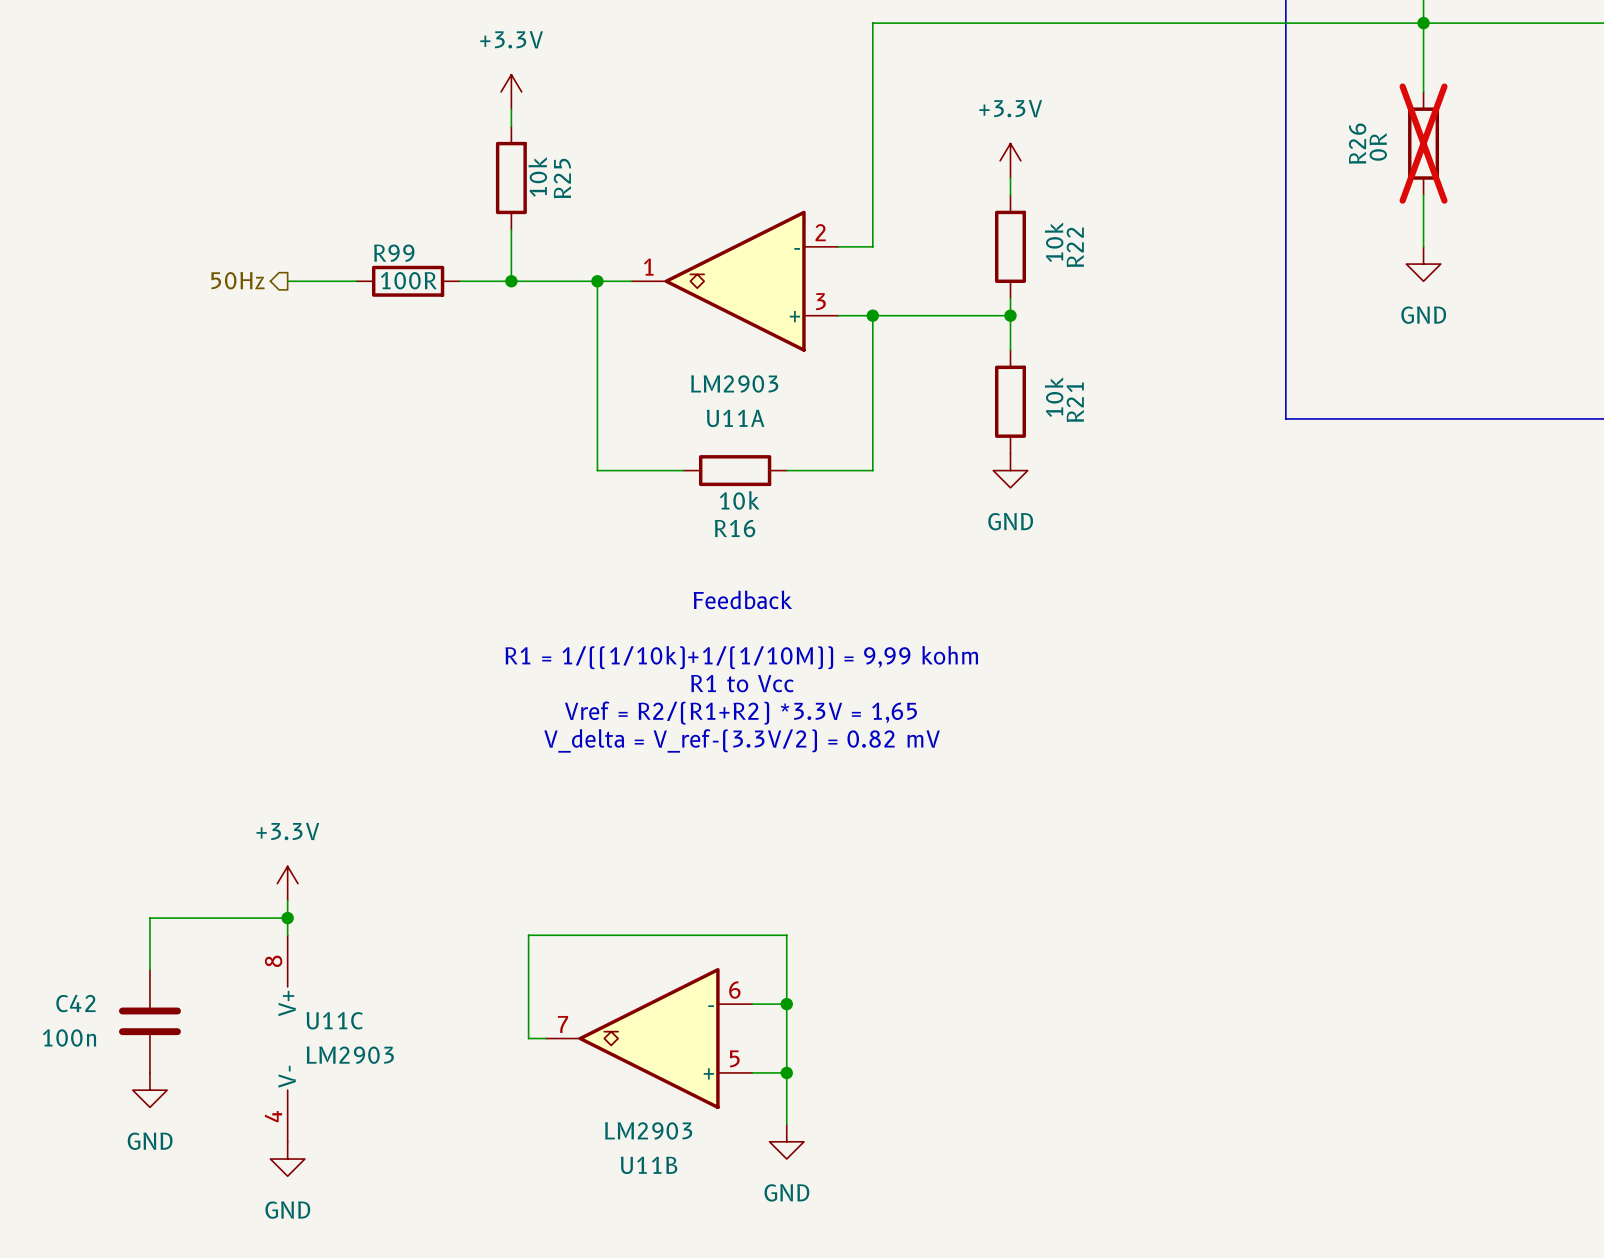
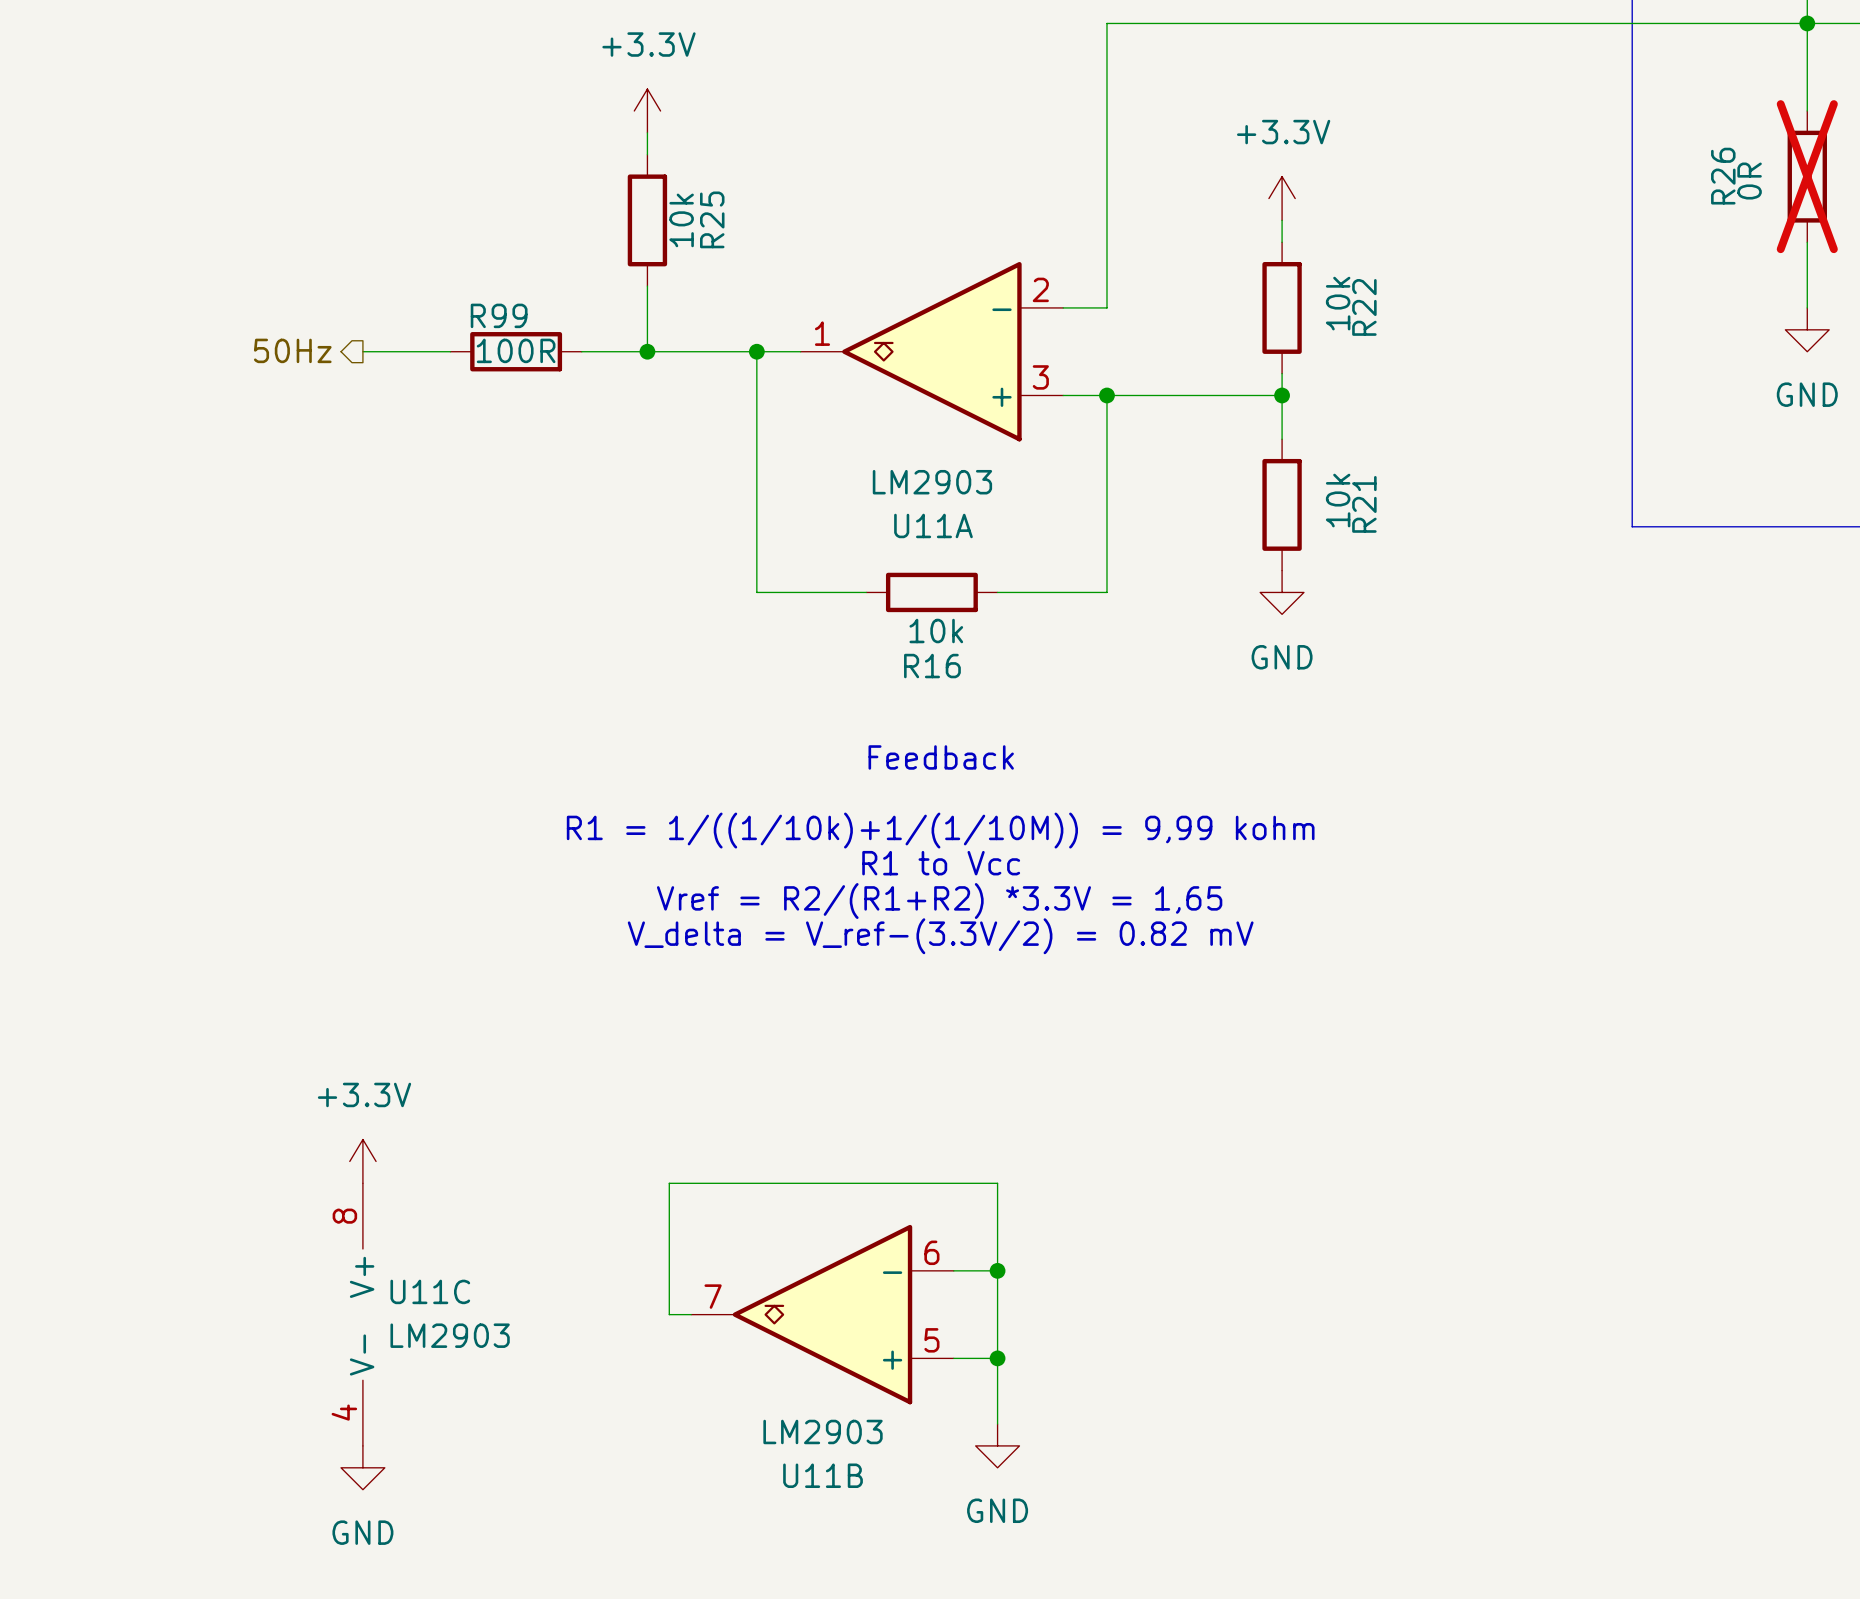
power symbol position: +3.3V (287, 883) -> +3.3V (362, 1161)
wire: (287, 918) (149, 918) (149, 969) -> none
junction: (287, 918) -> none
C42: 100n (149, 1021) -> none
power symbol: GND (149, 1090) -> none

